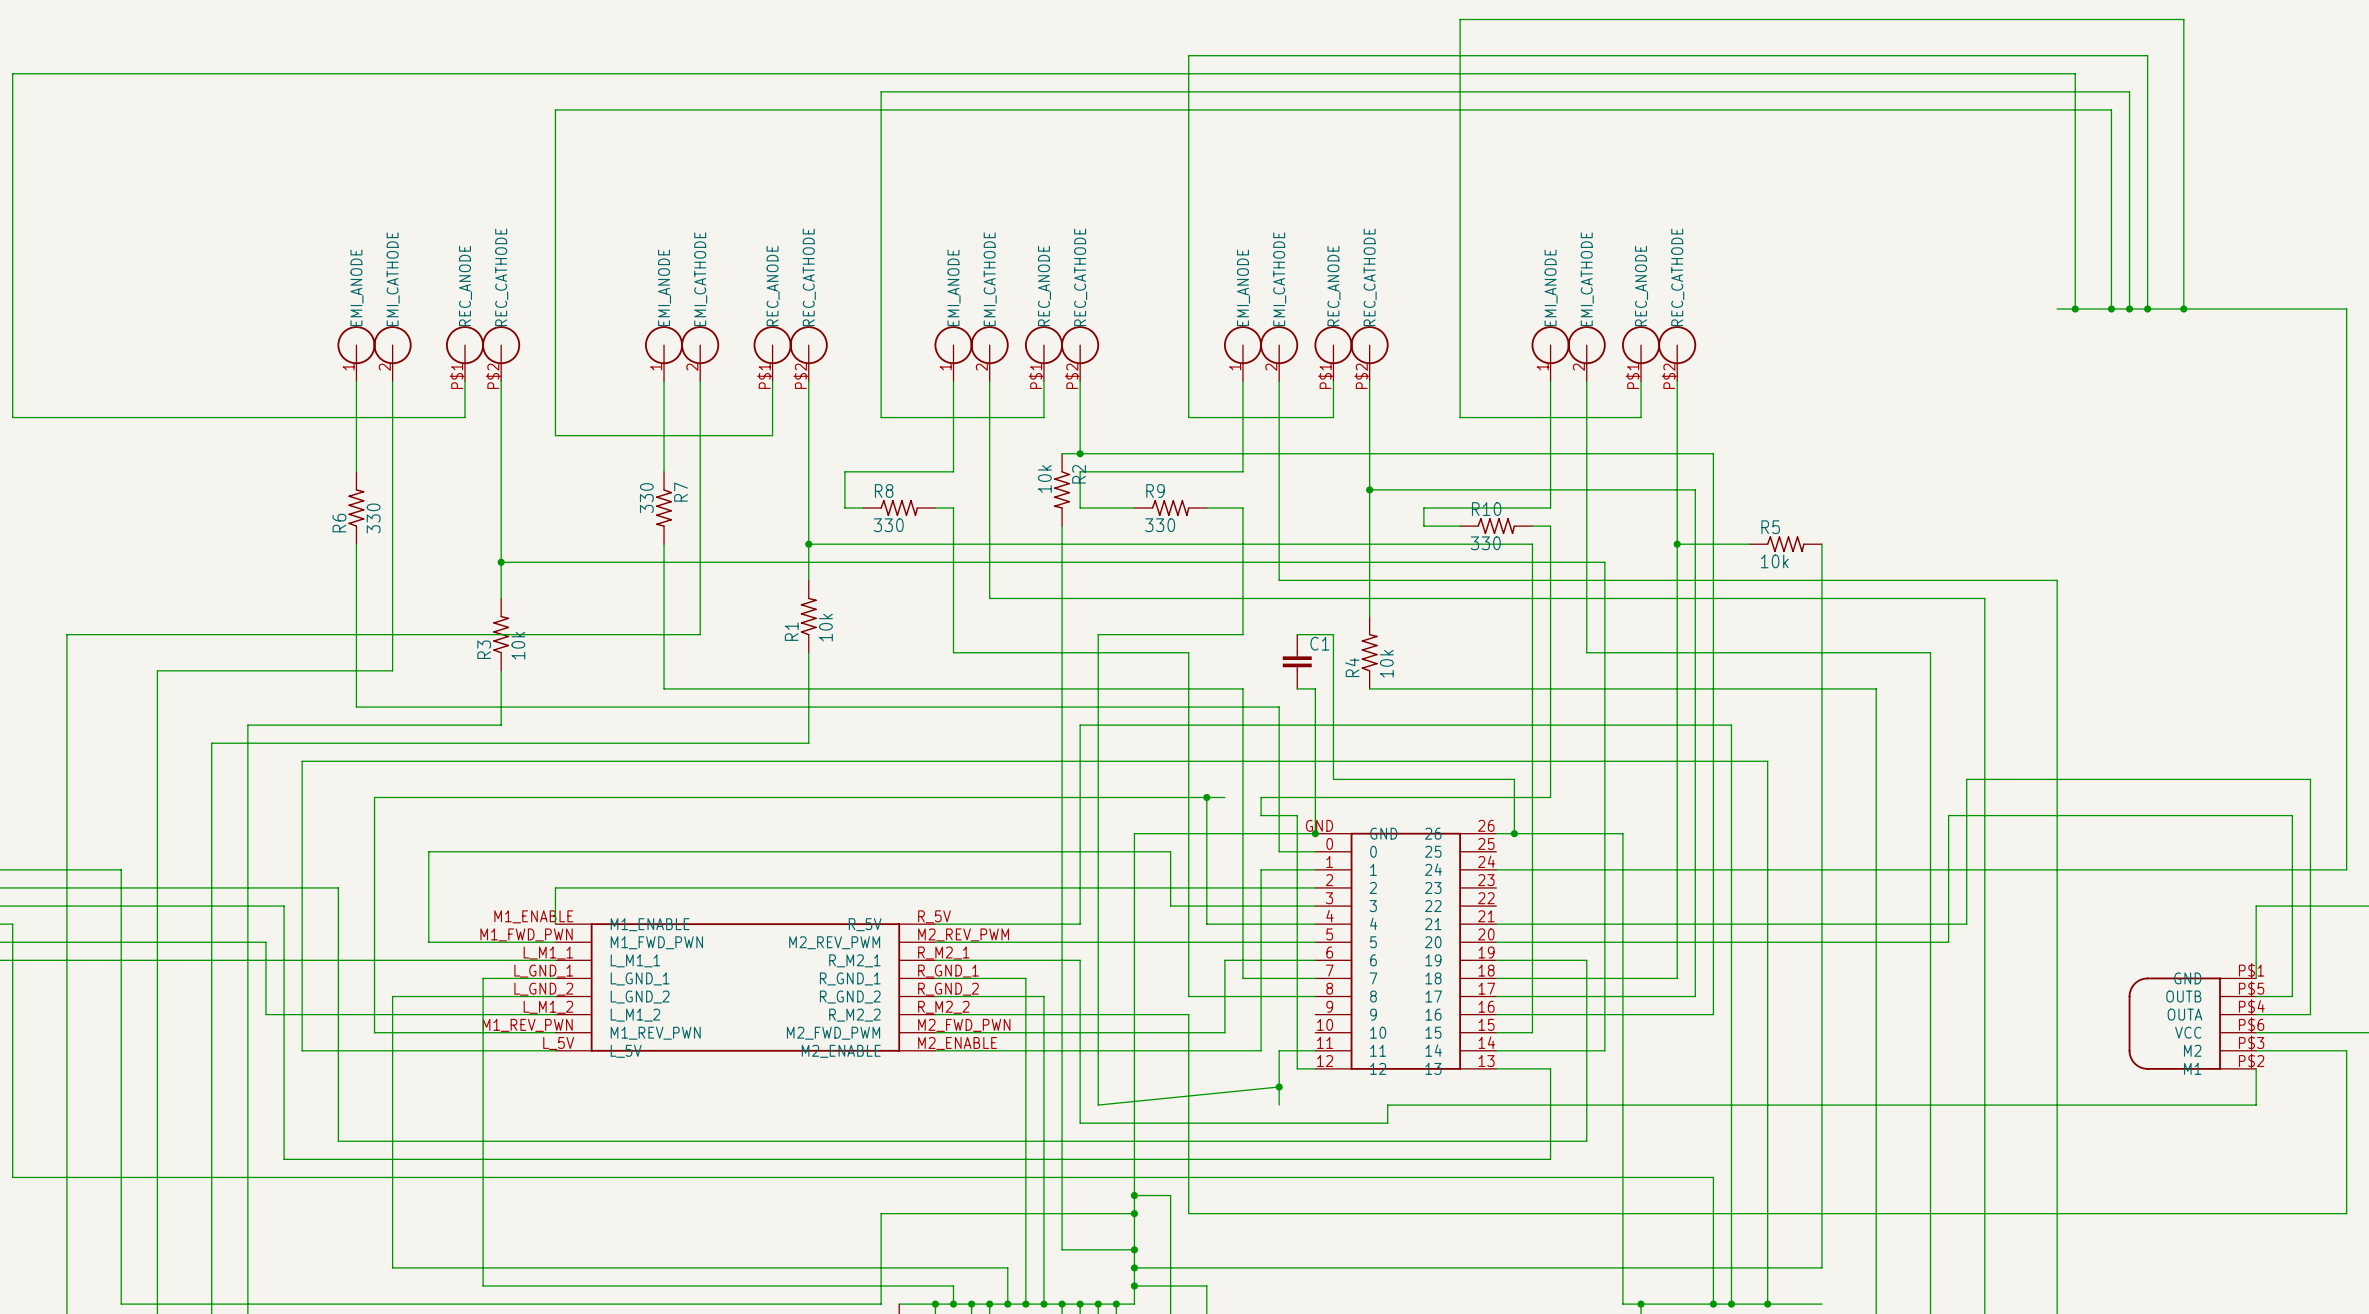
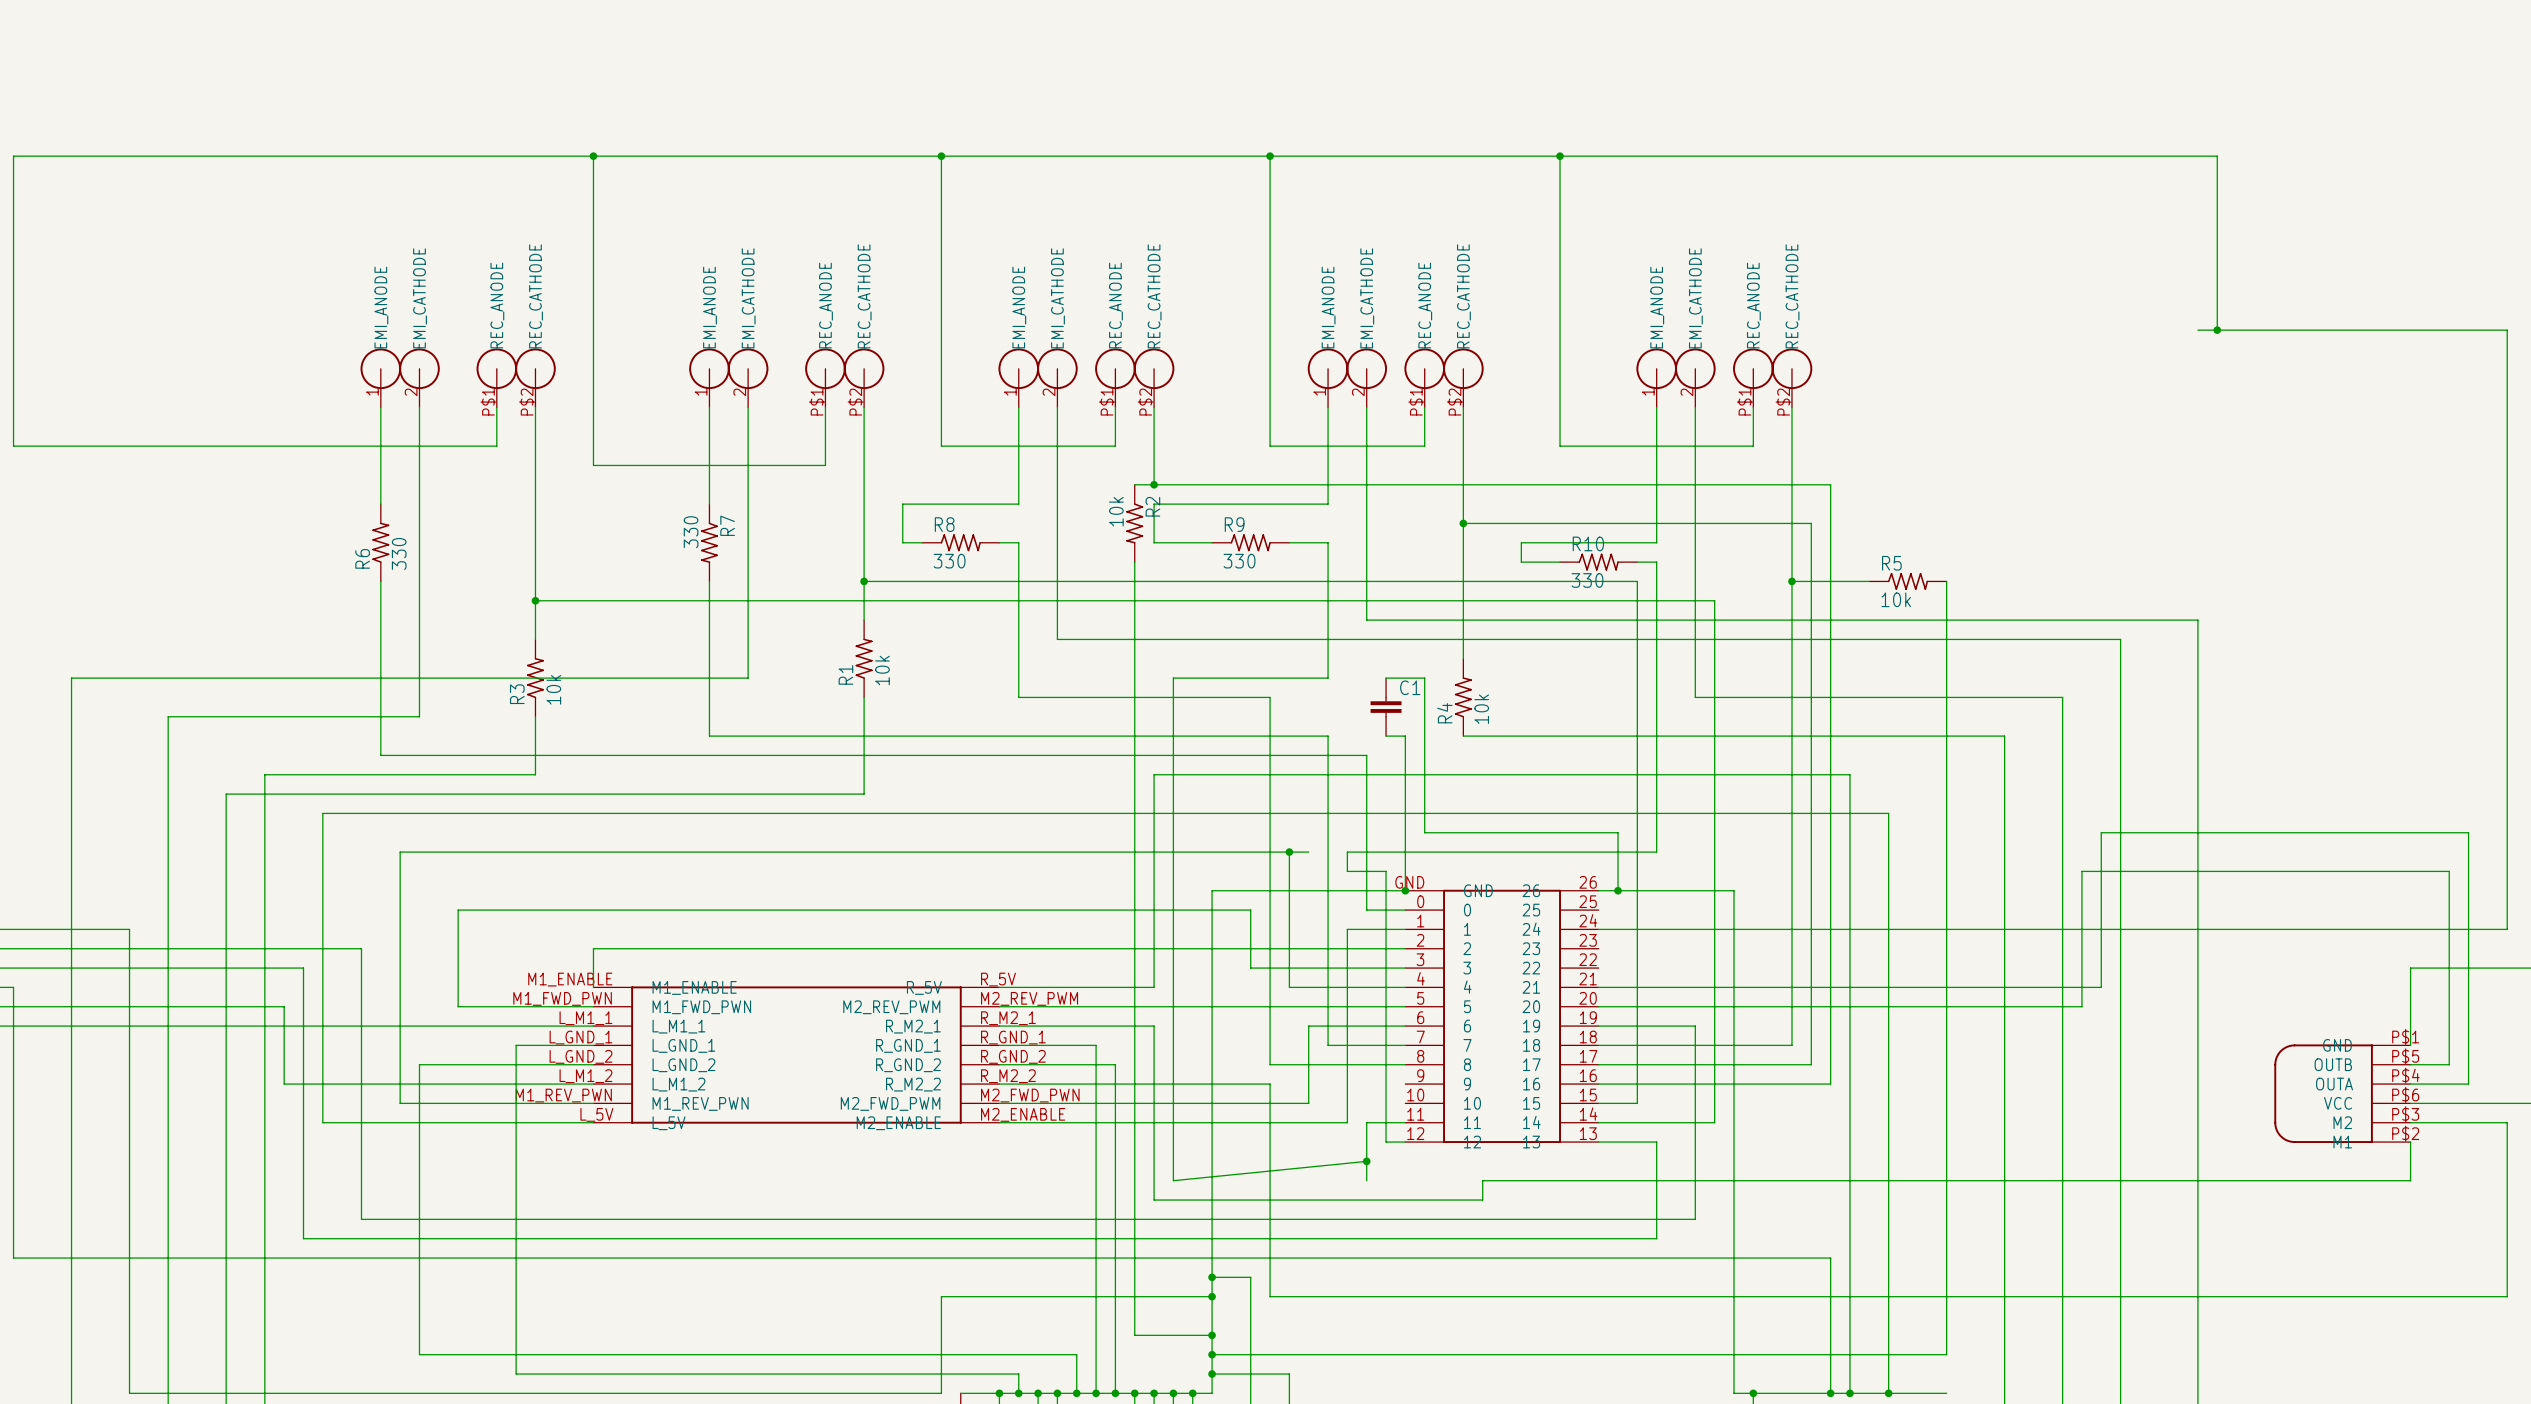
wire: (12, 146) (12, 73) (2075, 73) (2075, 146) -> (13, 156) (2217, 156)
wire: (555, 146) (555, 109) (2111, 109) (2111, 308) -> none
junction: none -> (593, 156)
wire: (881, 146) (881, 91) (2129, 91) (2129, 308) -> none
junction: none -> (941, 156)
wire: (1188, 146) (1188, 55) (2147, 55) (2147, 308) -> none
junction: none -> (1270, 156)
wire: (1460, 146) (1460, 19) (2183, 19) (2183, 308) -> none
junction: none -> (1560, 156)
junction: (2111, 308) -> none
junction: (2129, 308) -> none
junction: (2147, 308) -> none
junction: (2183, 308) -> none

